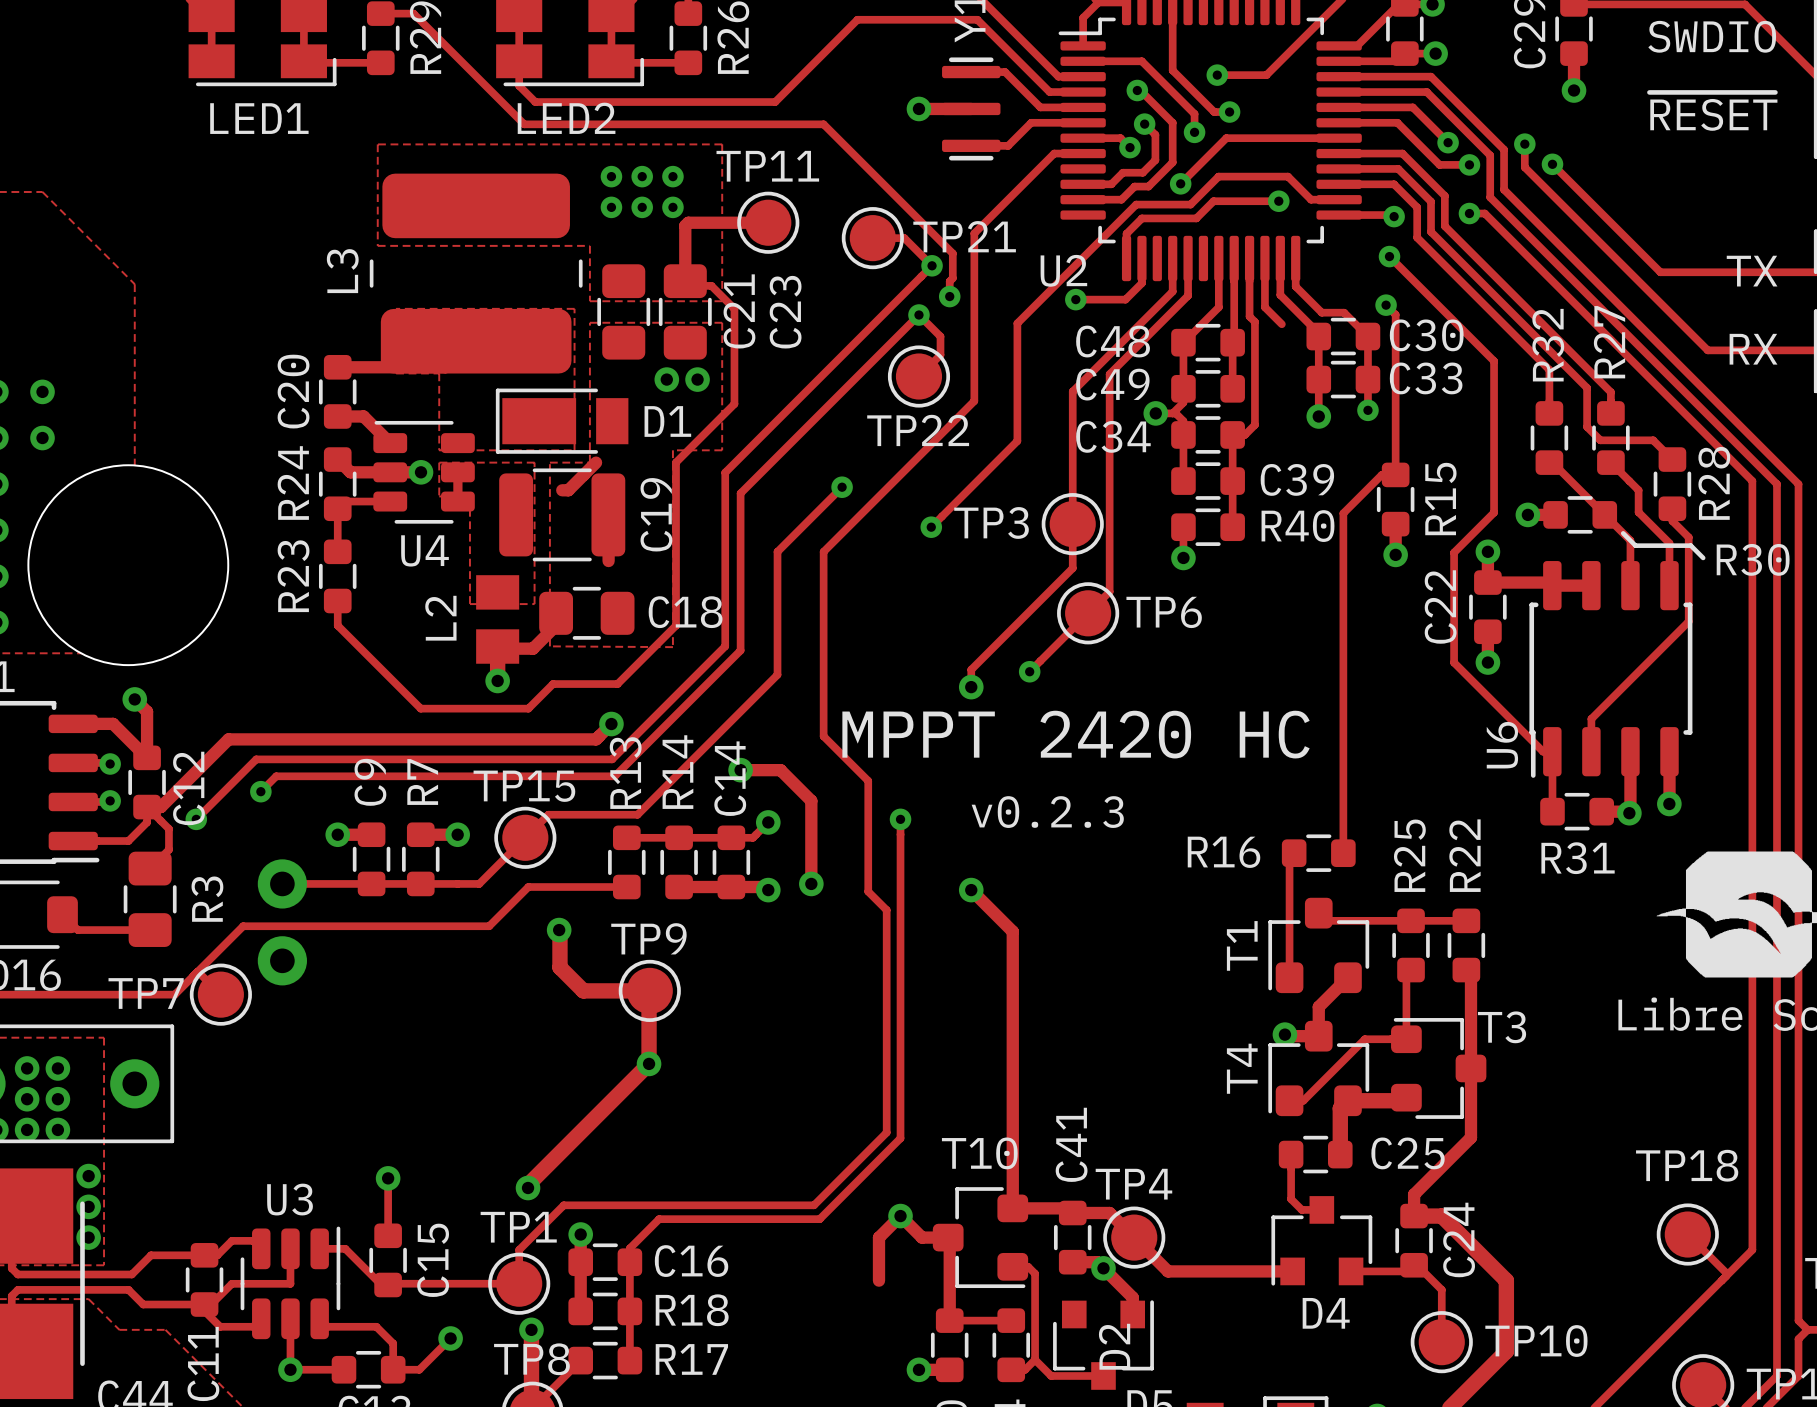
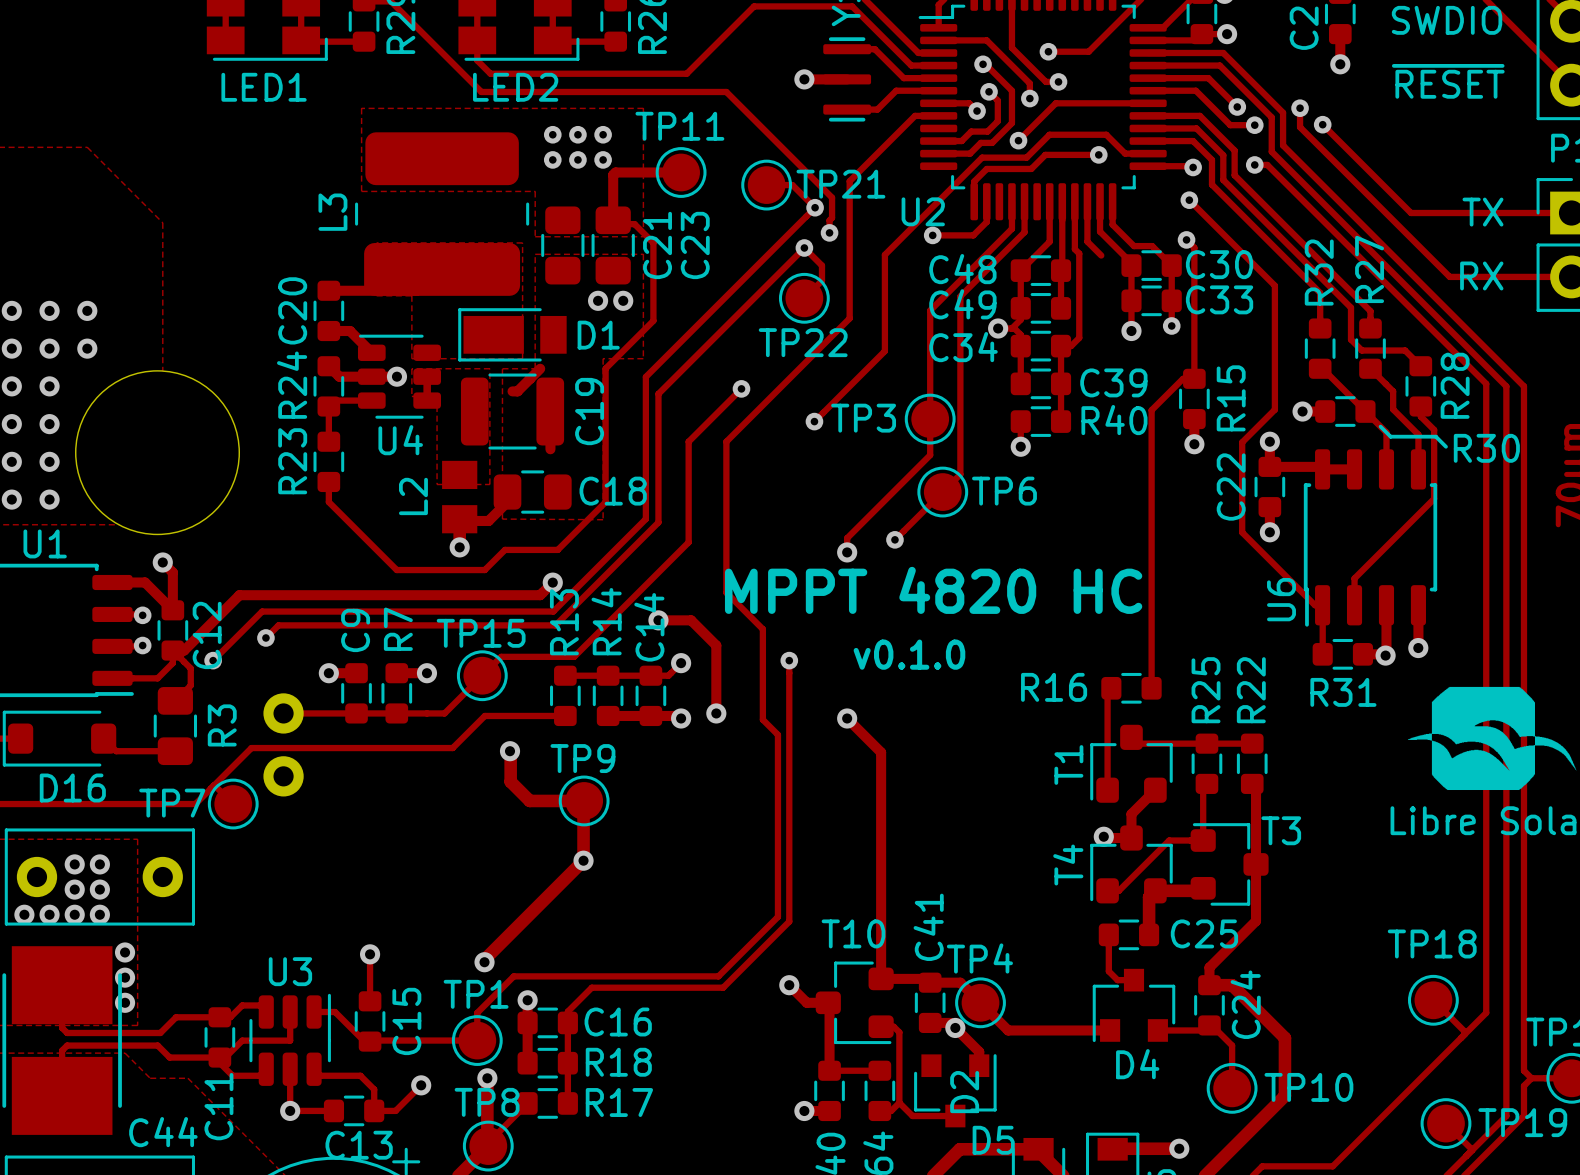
text: MPPT 2420 HC (1076, 734) -> MPPT 4820 HC (933, 590)
text: v0.2.3 (1047, 812) -> v0.1.0 (909, 654)
track: (900, 1216) (879, 1237) (879, 1280) -> none

